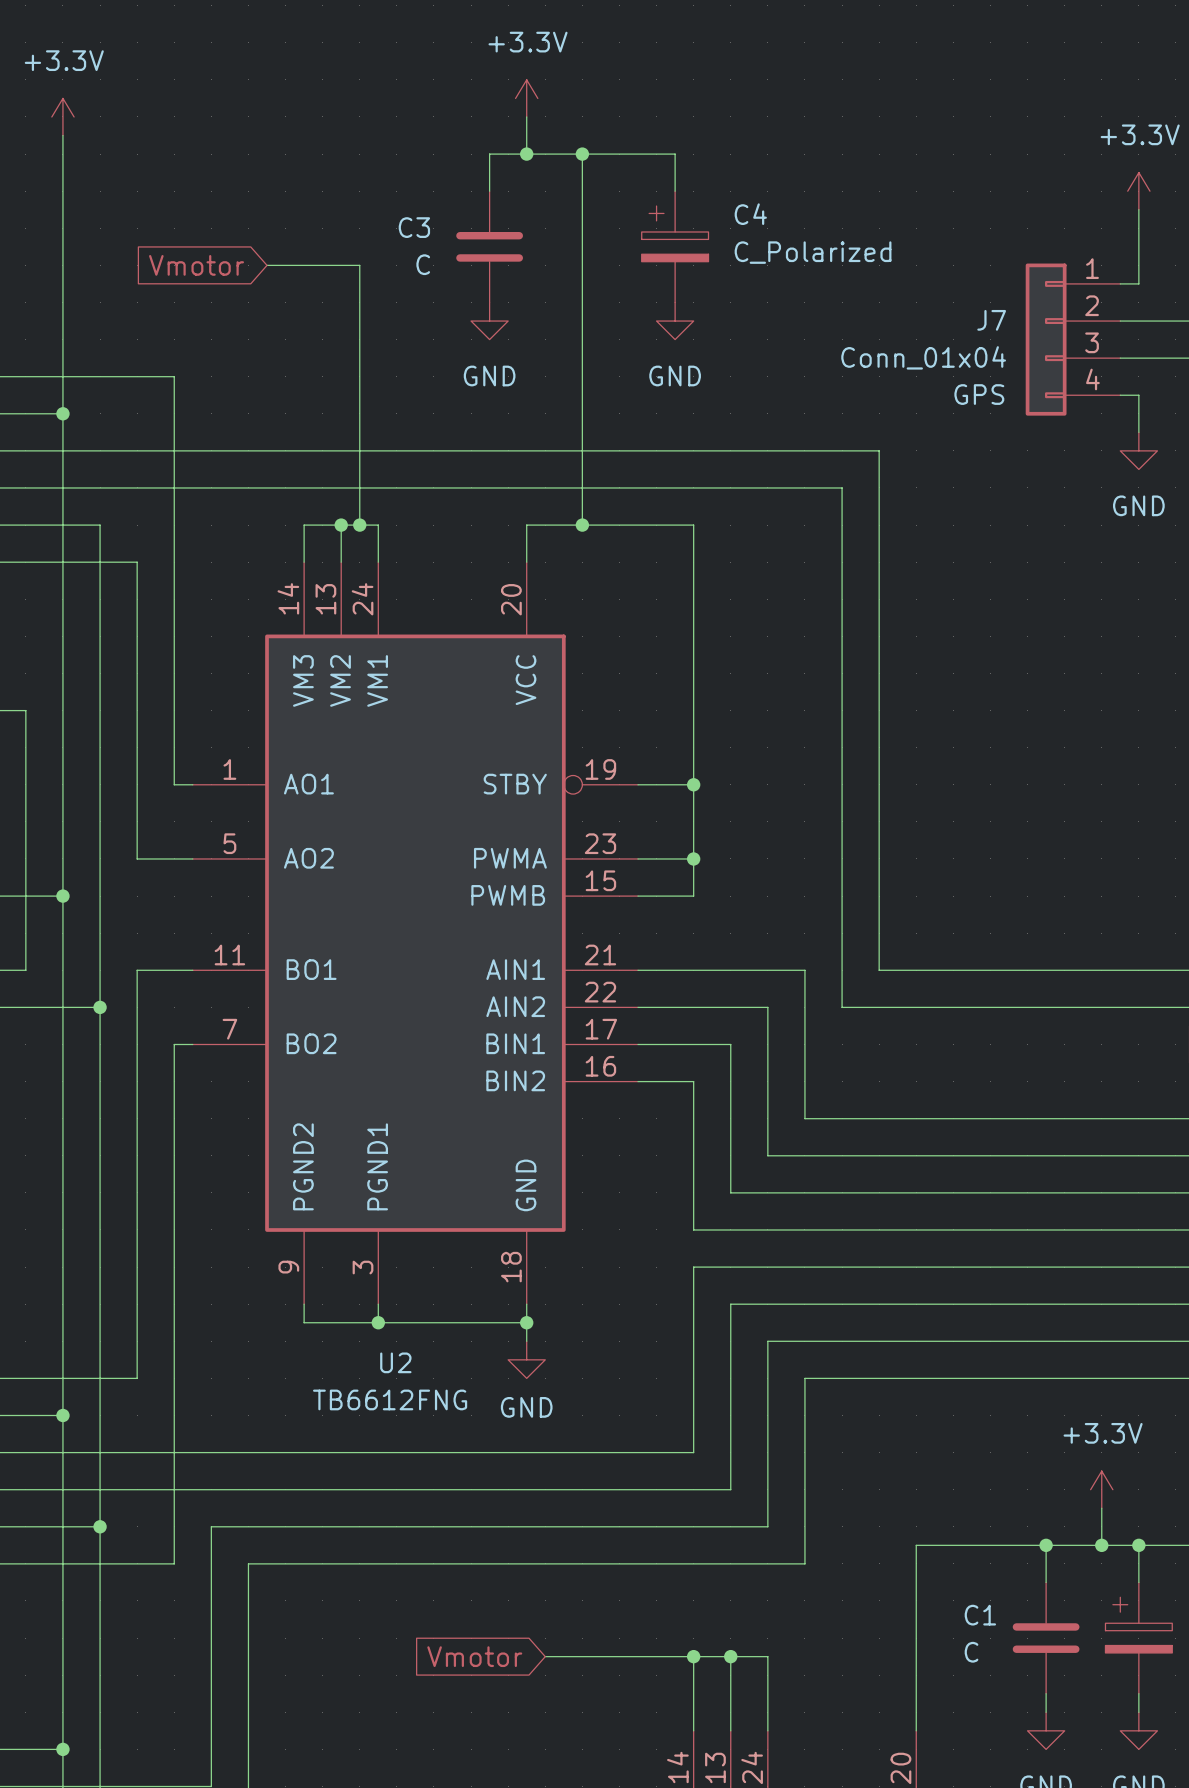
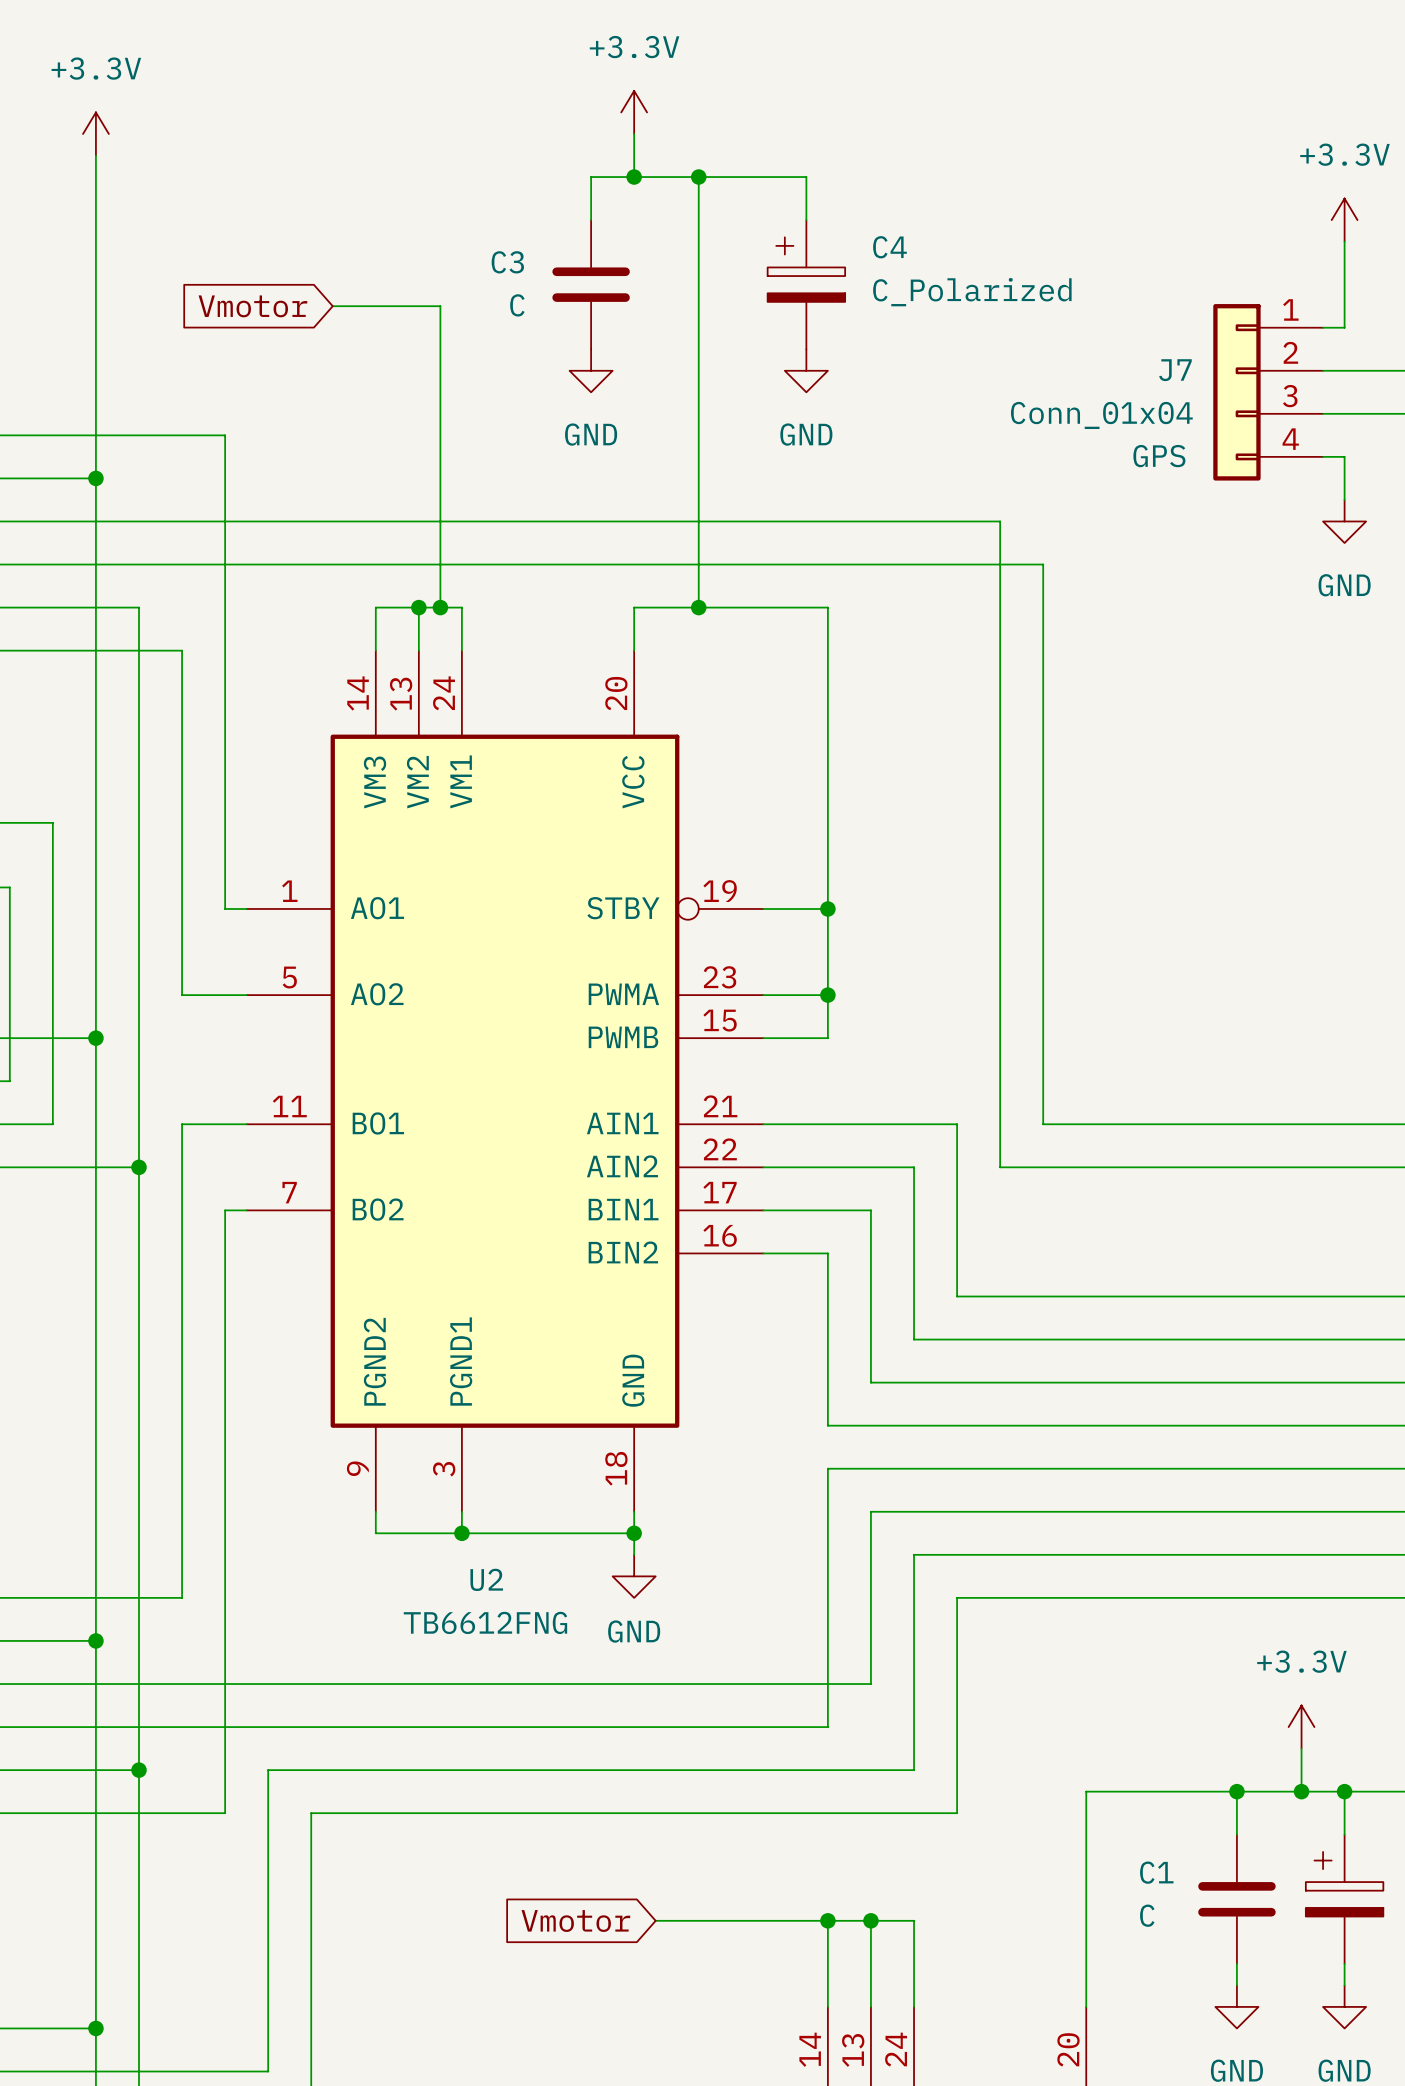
wire: (842, 450) (879, 450) (879, 487) -> (1000, 521) (1000, 564) (1043, 564)
wire: (730, 1452) (730, 1489) (693, 1489) -> (870, 1684) (827, 1684) (827, 1727)

